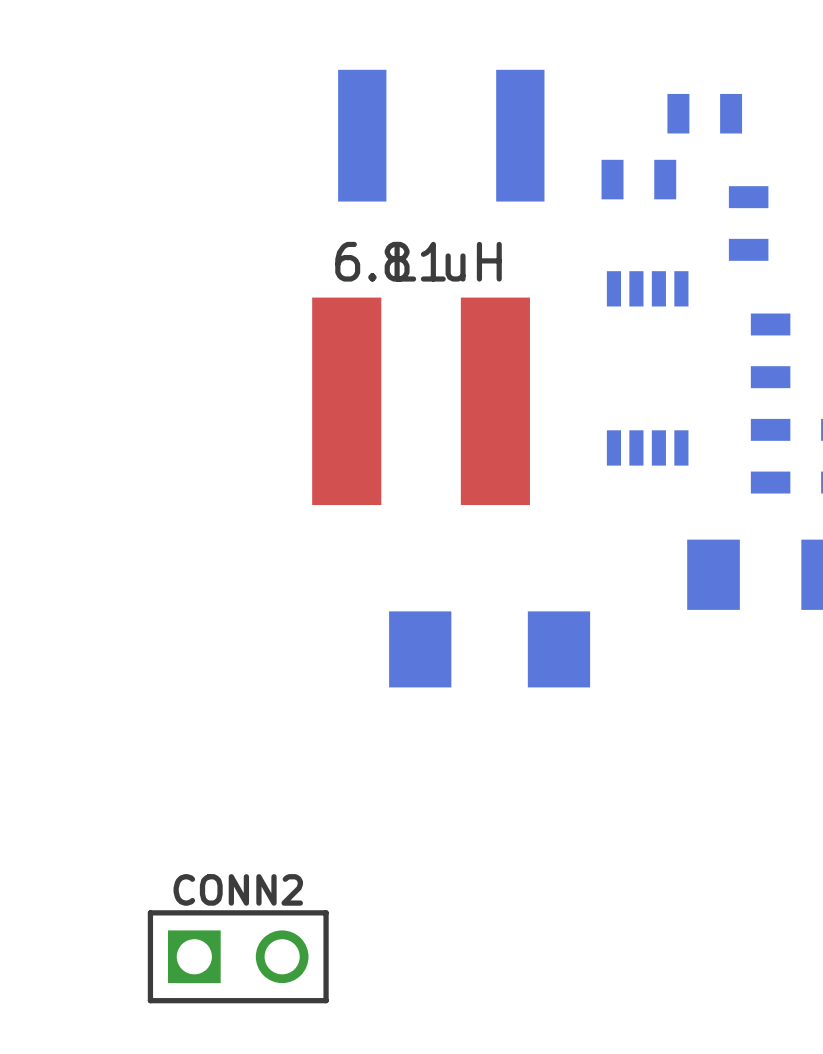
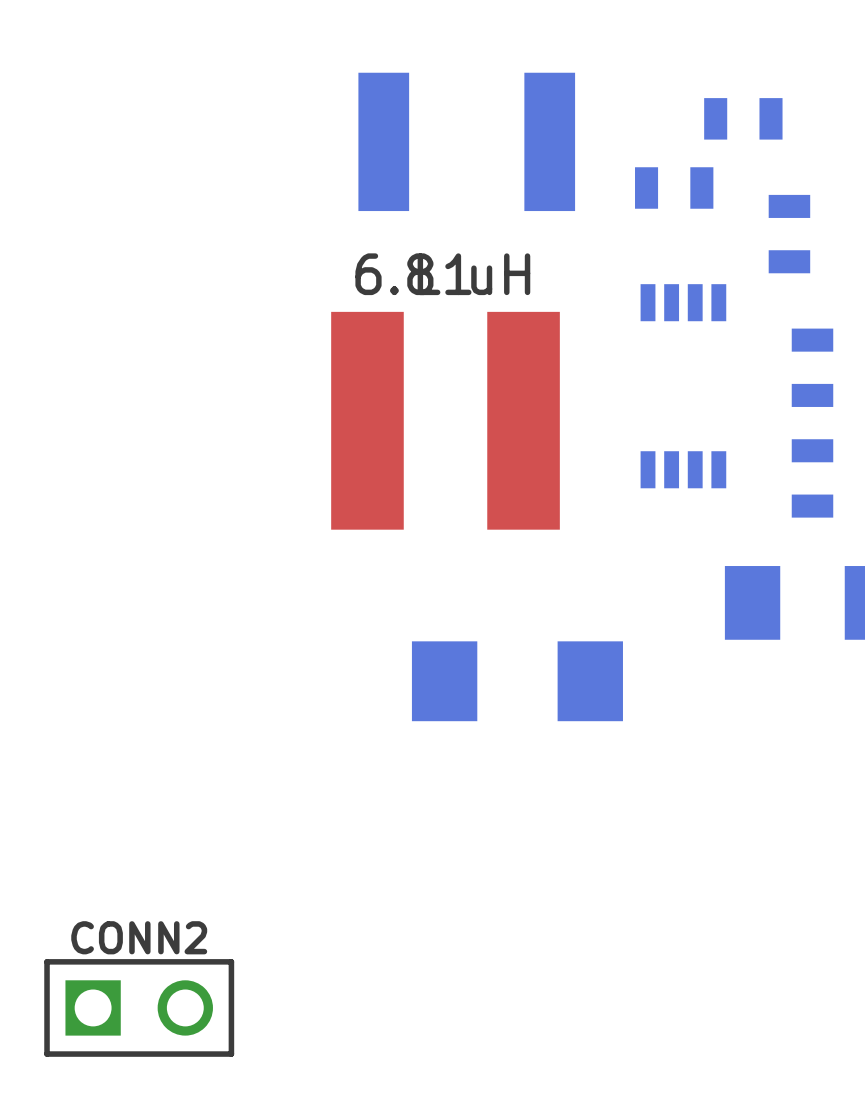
CONN2 position: (238, 956) -> (139, 1007)

